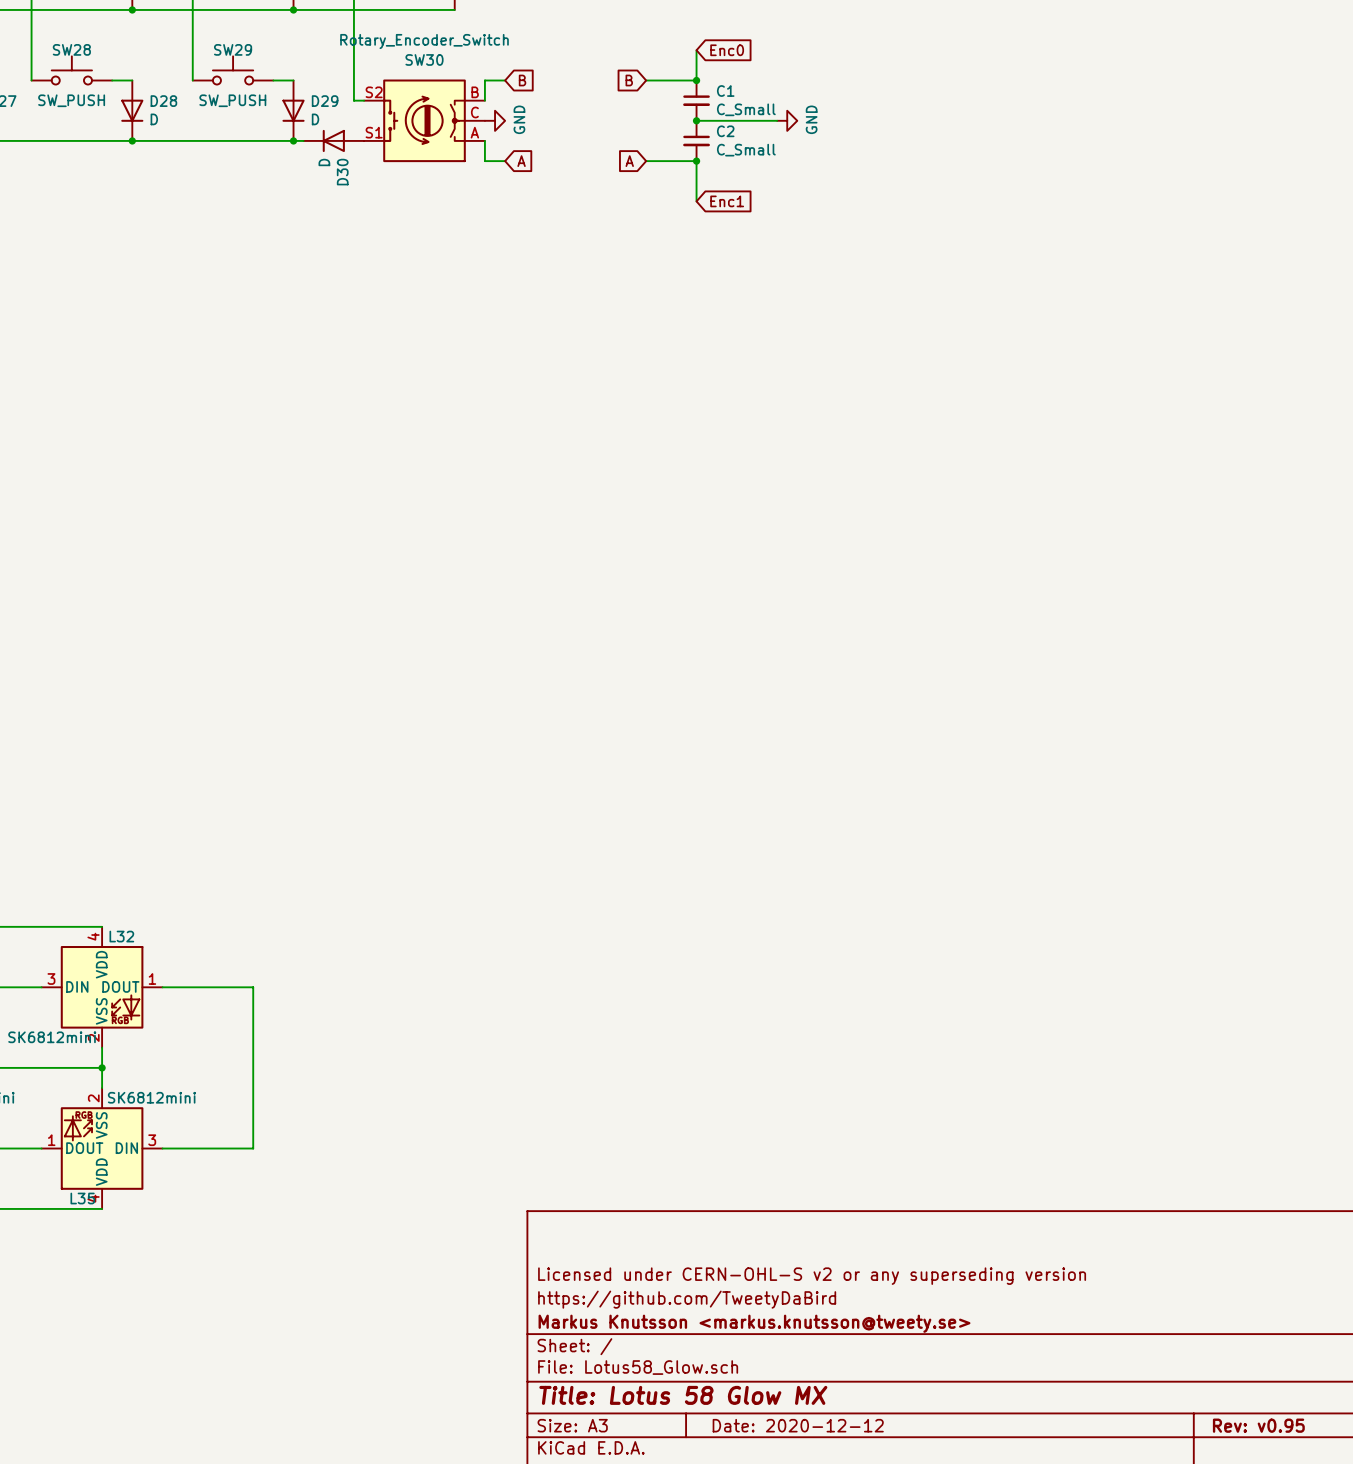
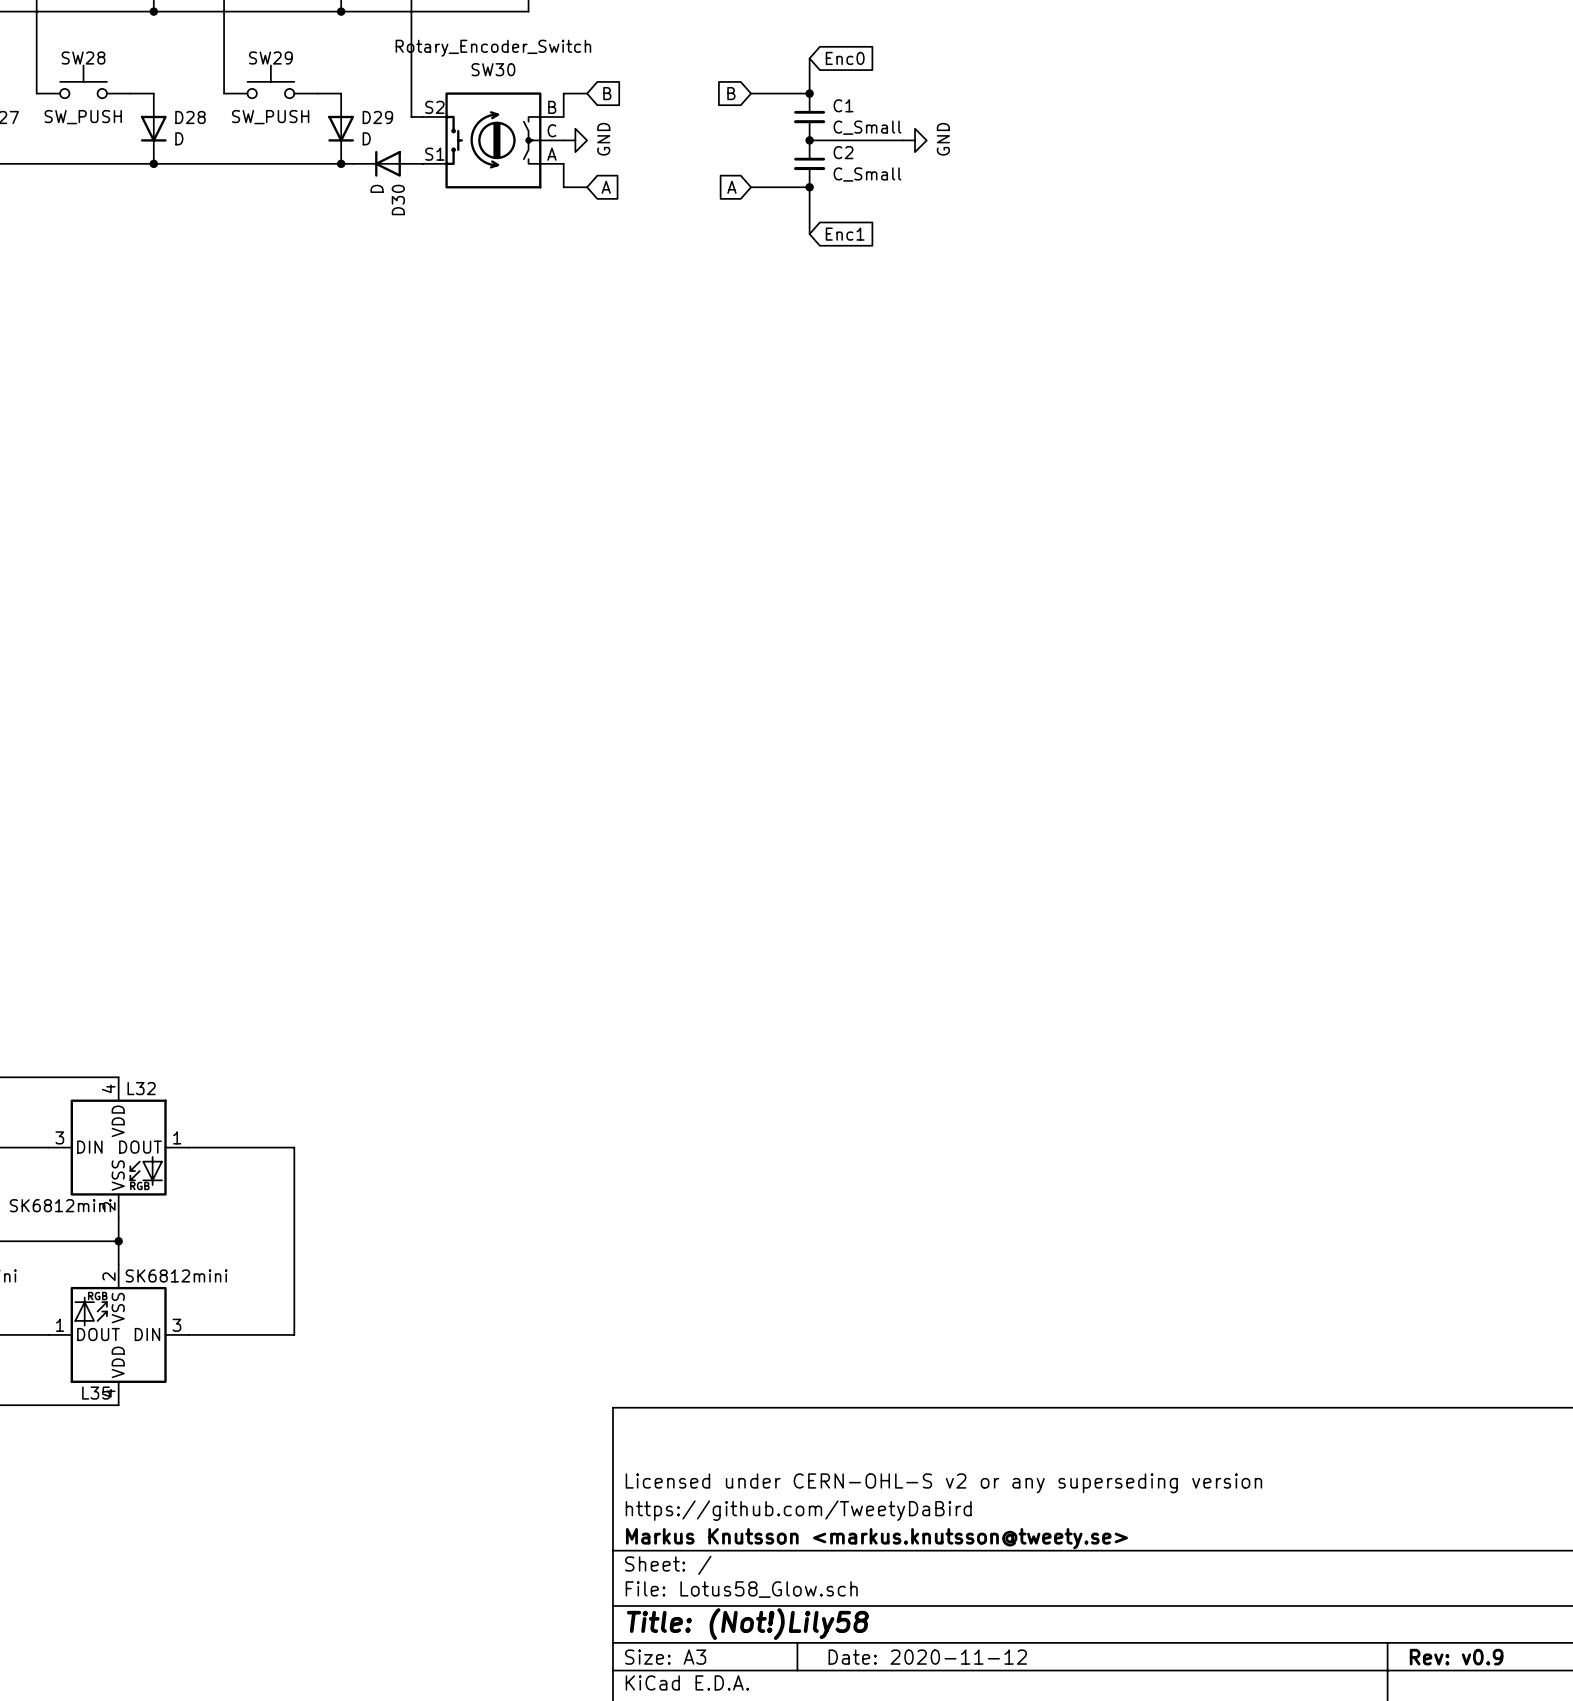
title block: Title: Lotus 58 Glow MX (683, 1395) -> Title: (Not!)Lily58 (747, 1624)
title block: Date: 2020-12-12 (798, 1425) -> Date: 2020-11-12 (927, 1657)
title block: Rev: v0.95 (1258, 1425) -> Rev: v0.9 (1456, 1657)

